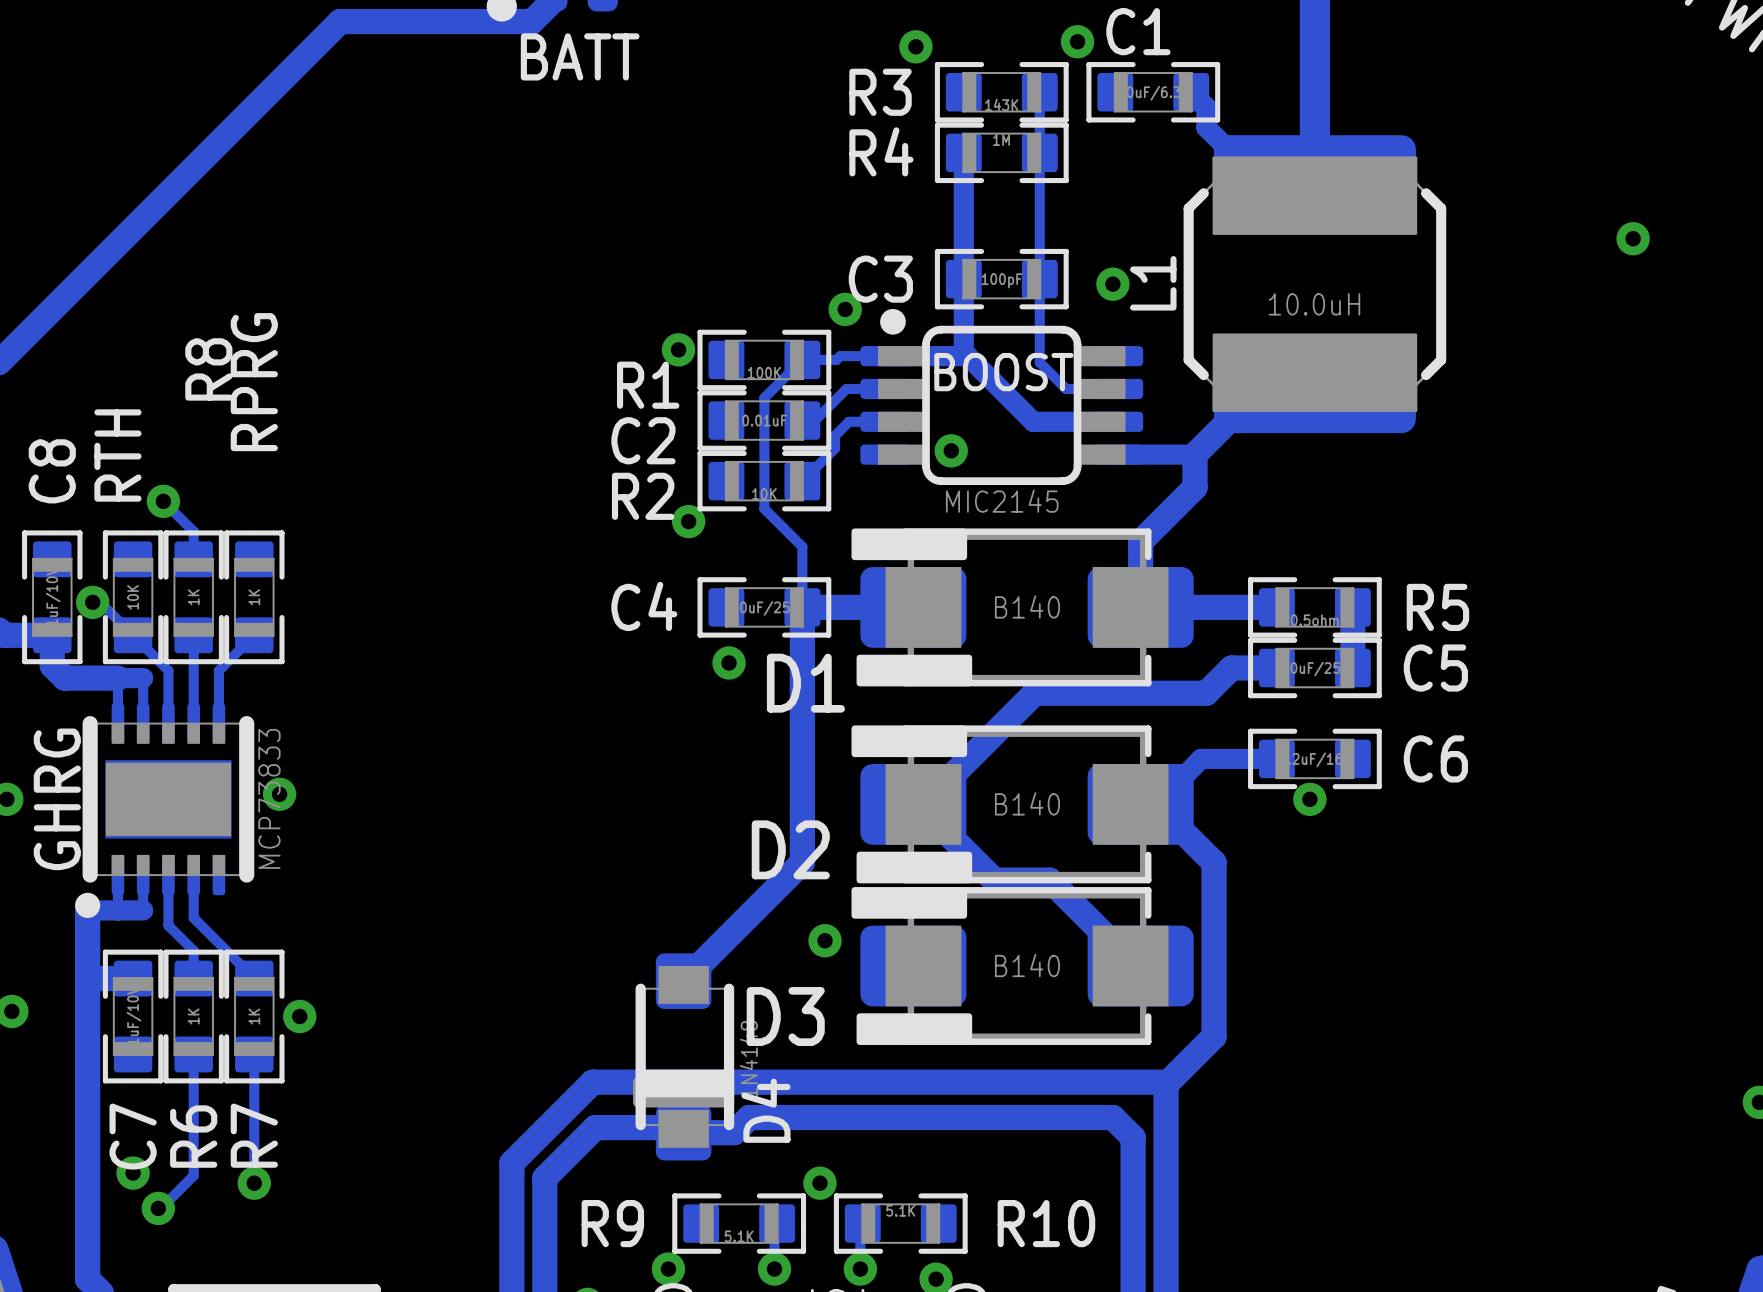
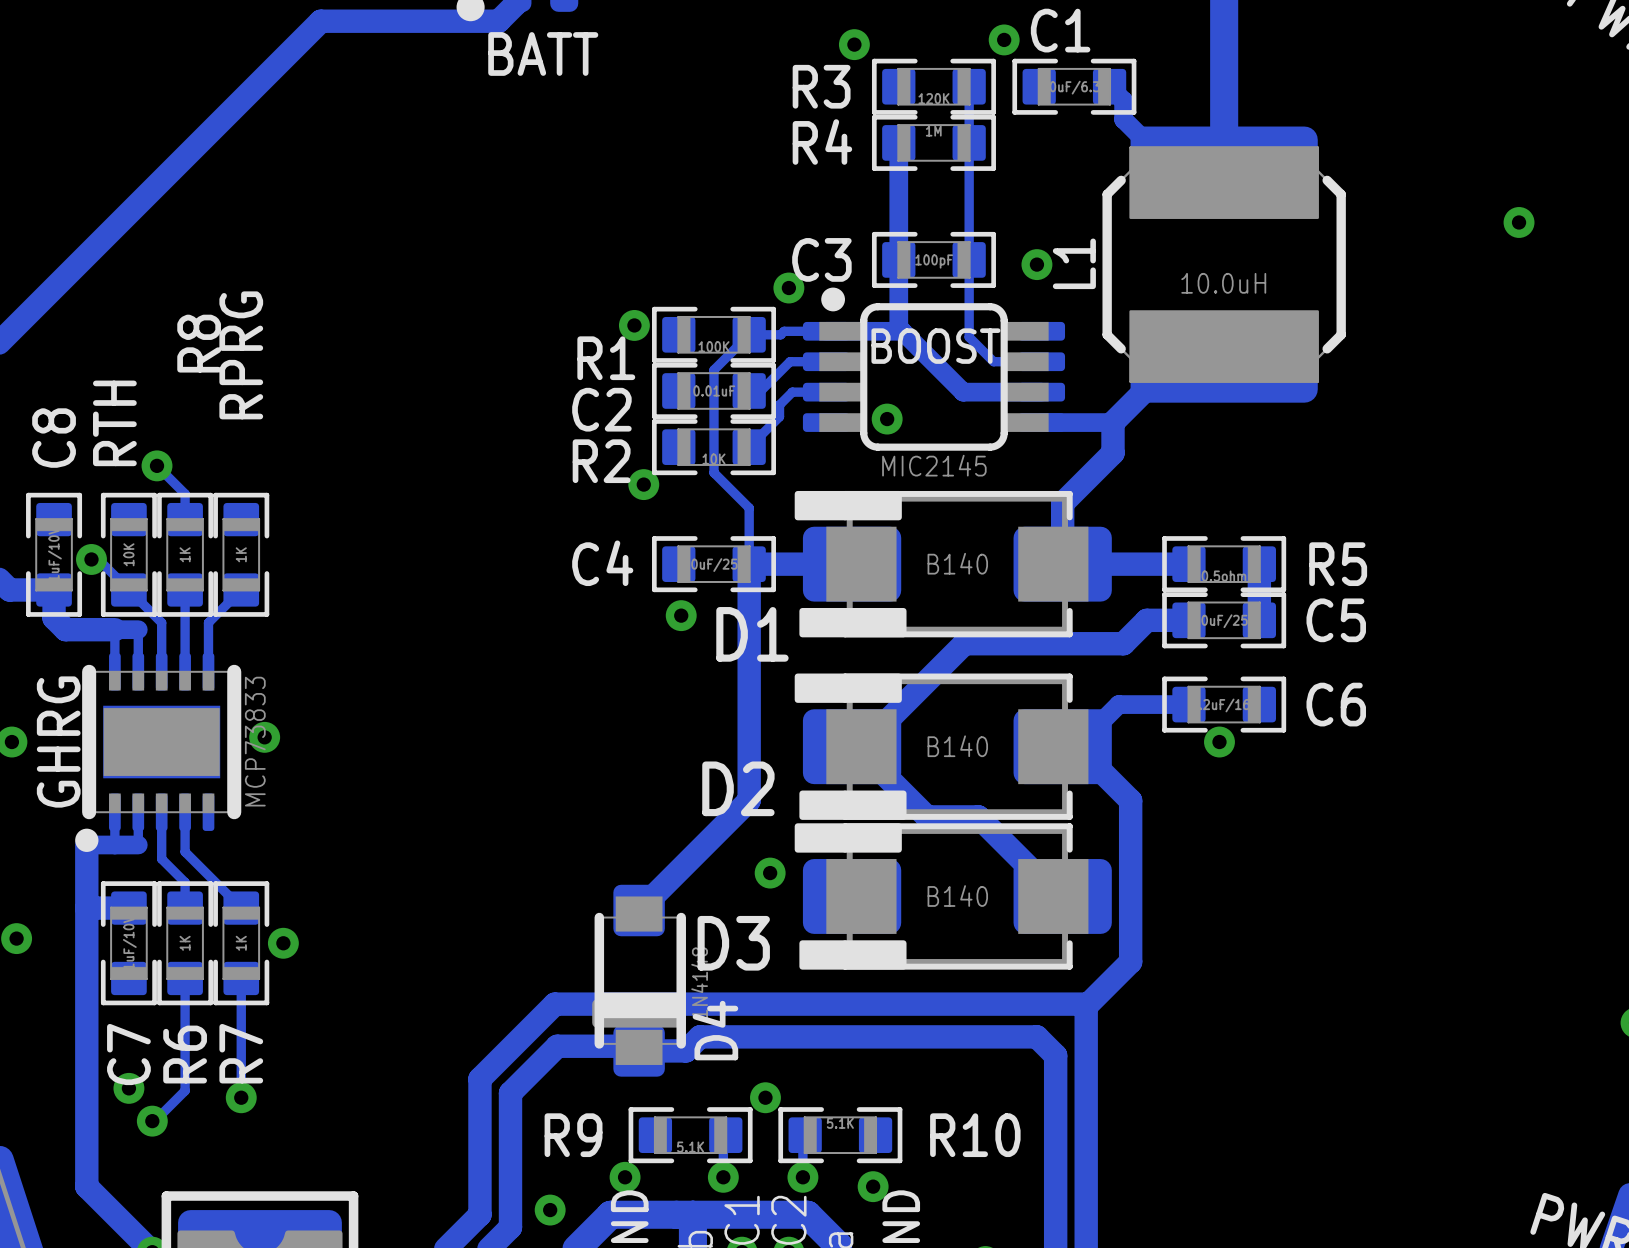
R3 value: 143K (1001, 104) -> 120K (933, 98)

